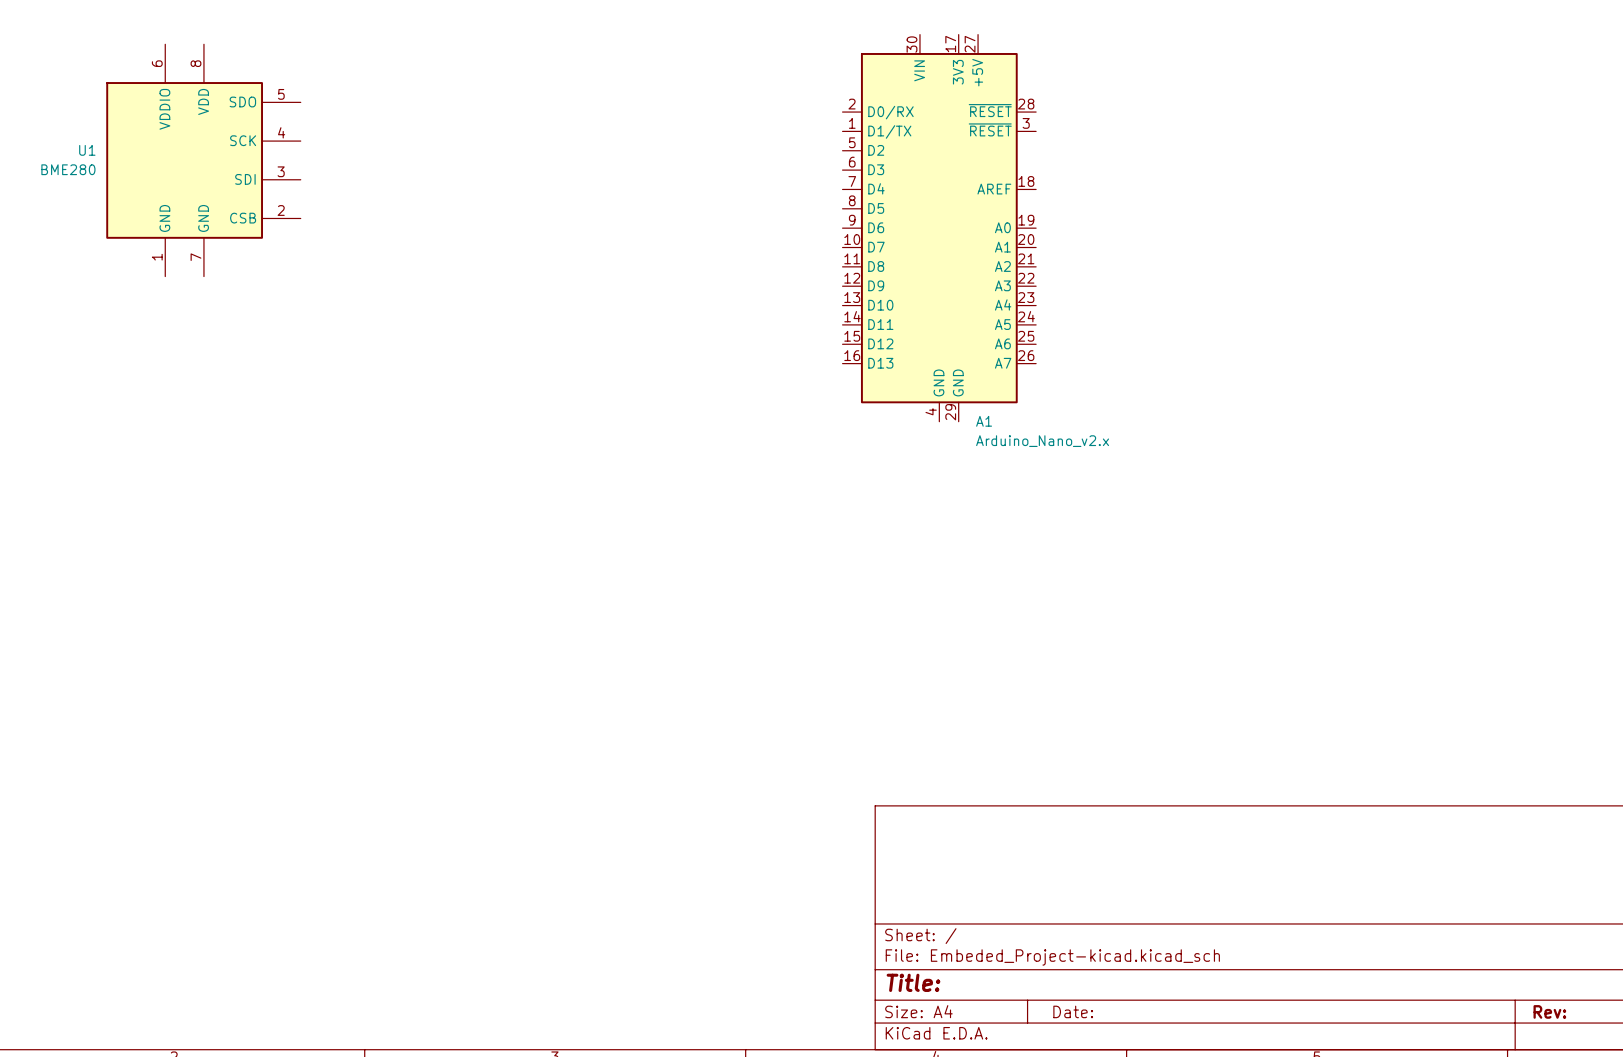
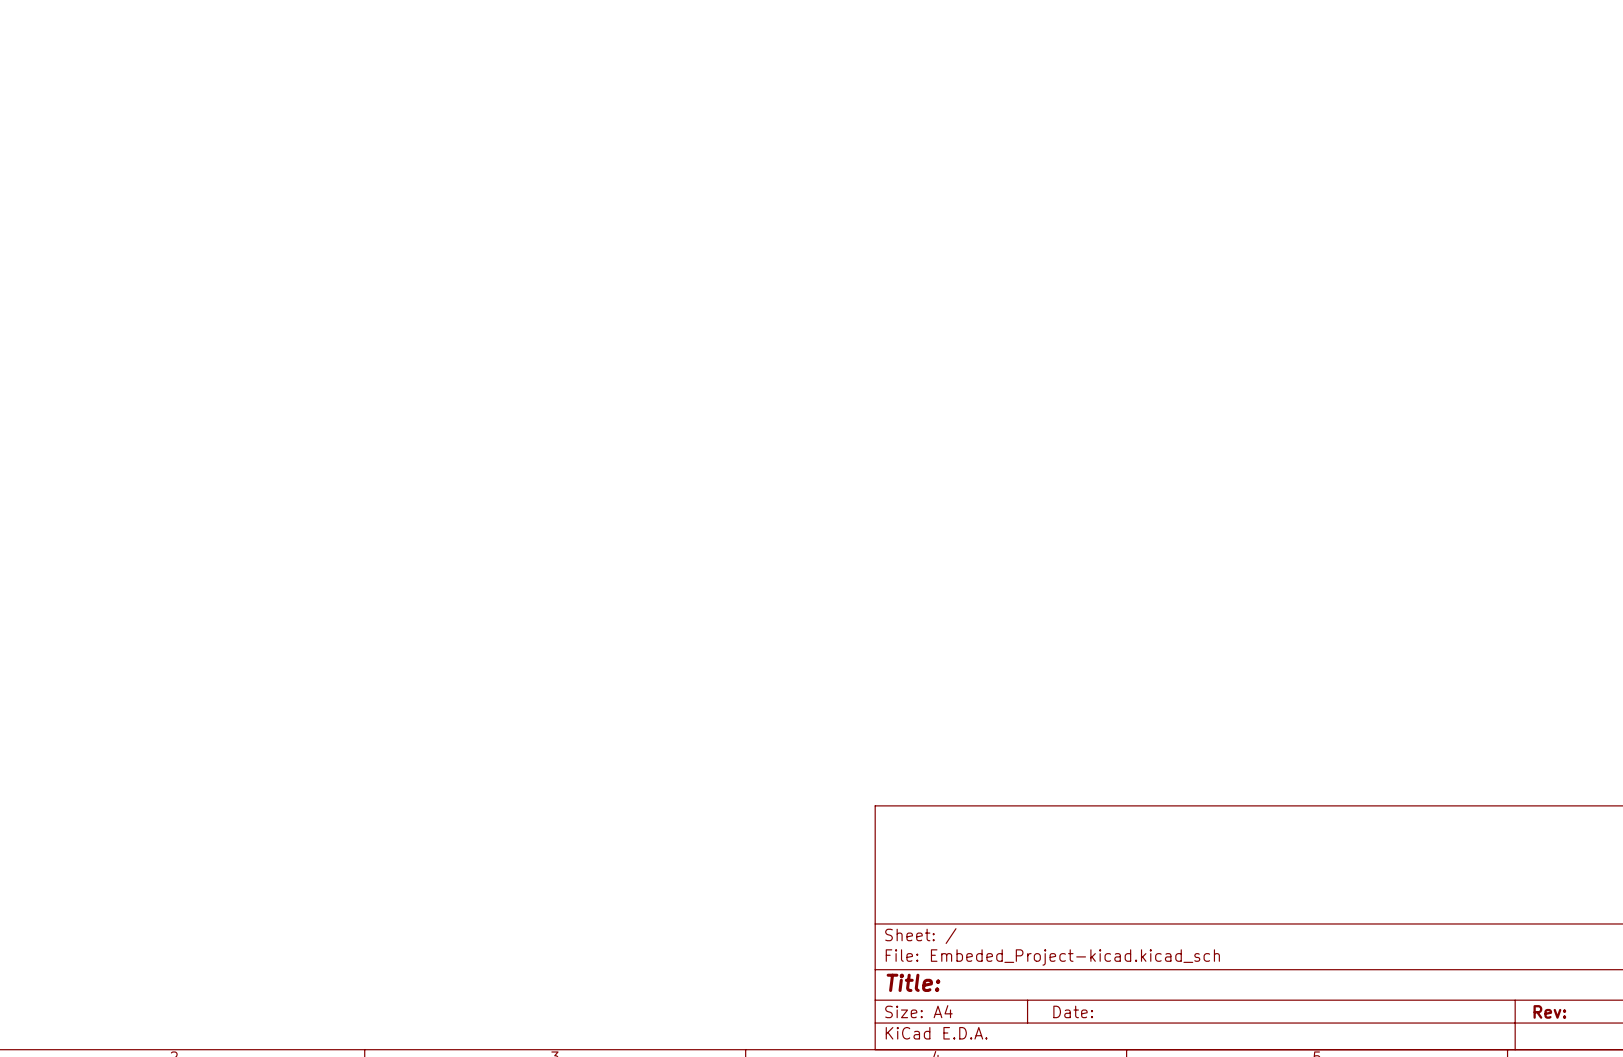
U1: BME280 (203, 160) -> none
A1: Arduino_Nano_v2.x (939, 228) -> none

